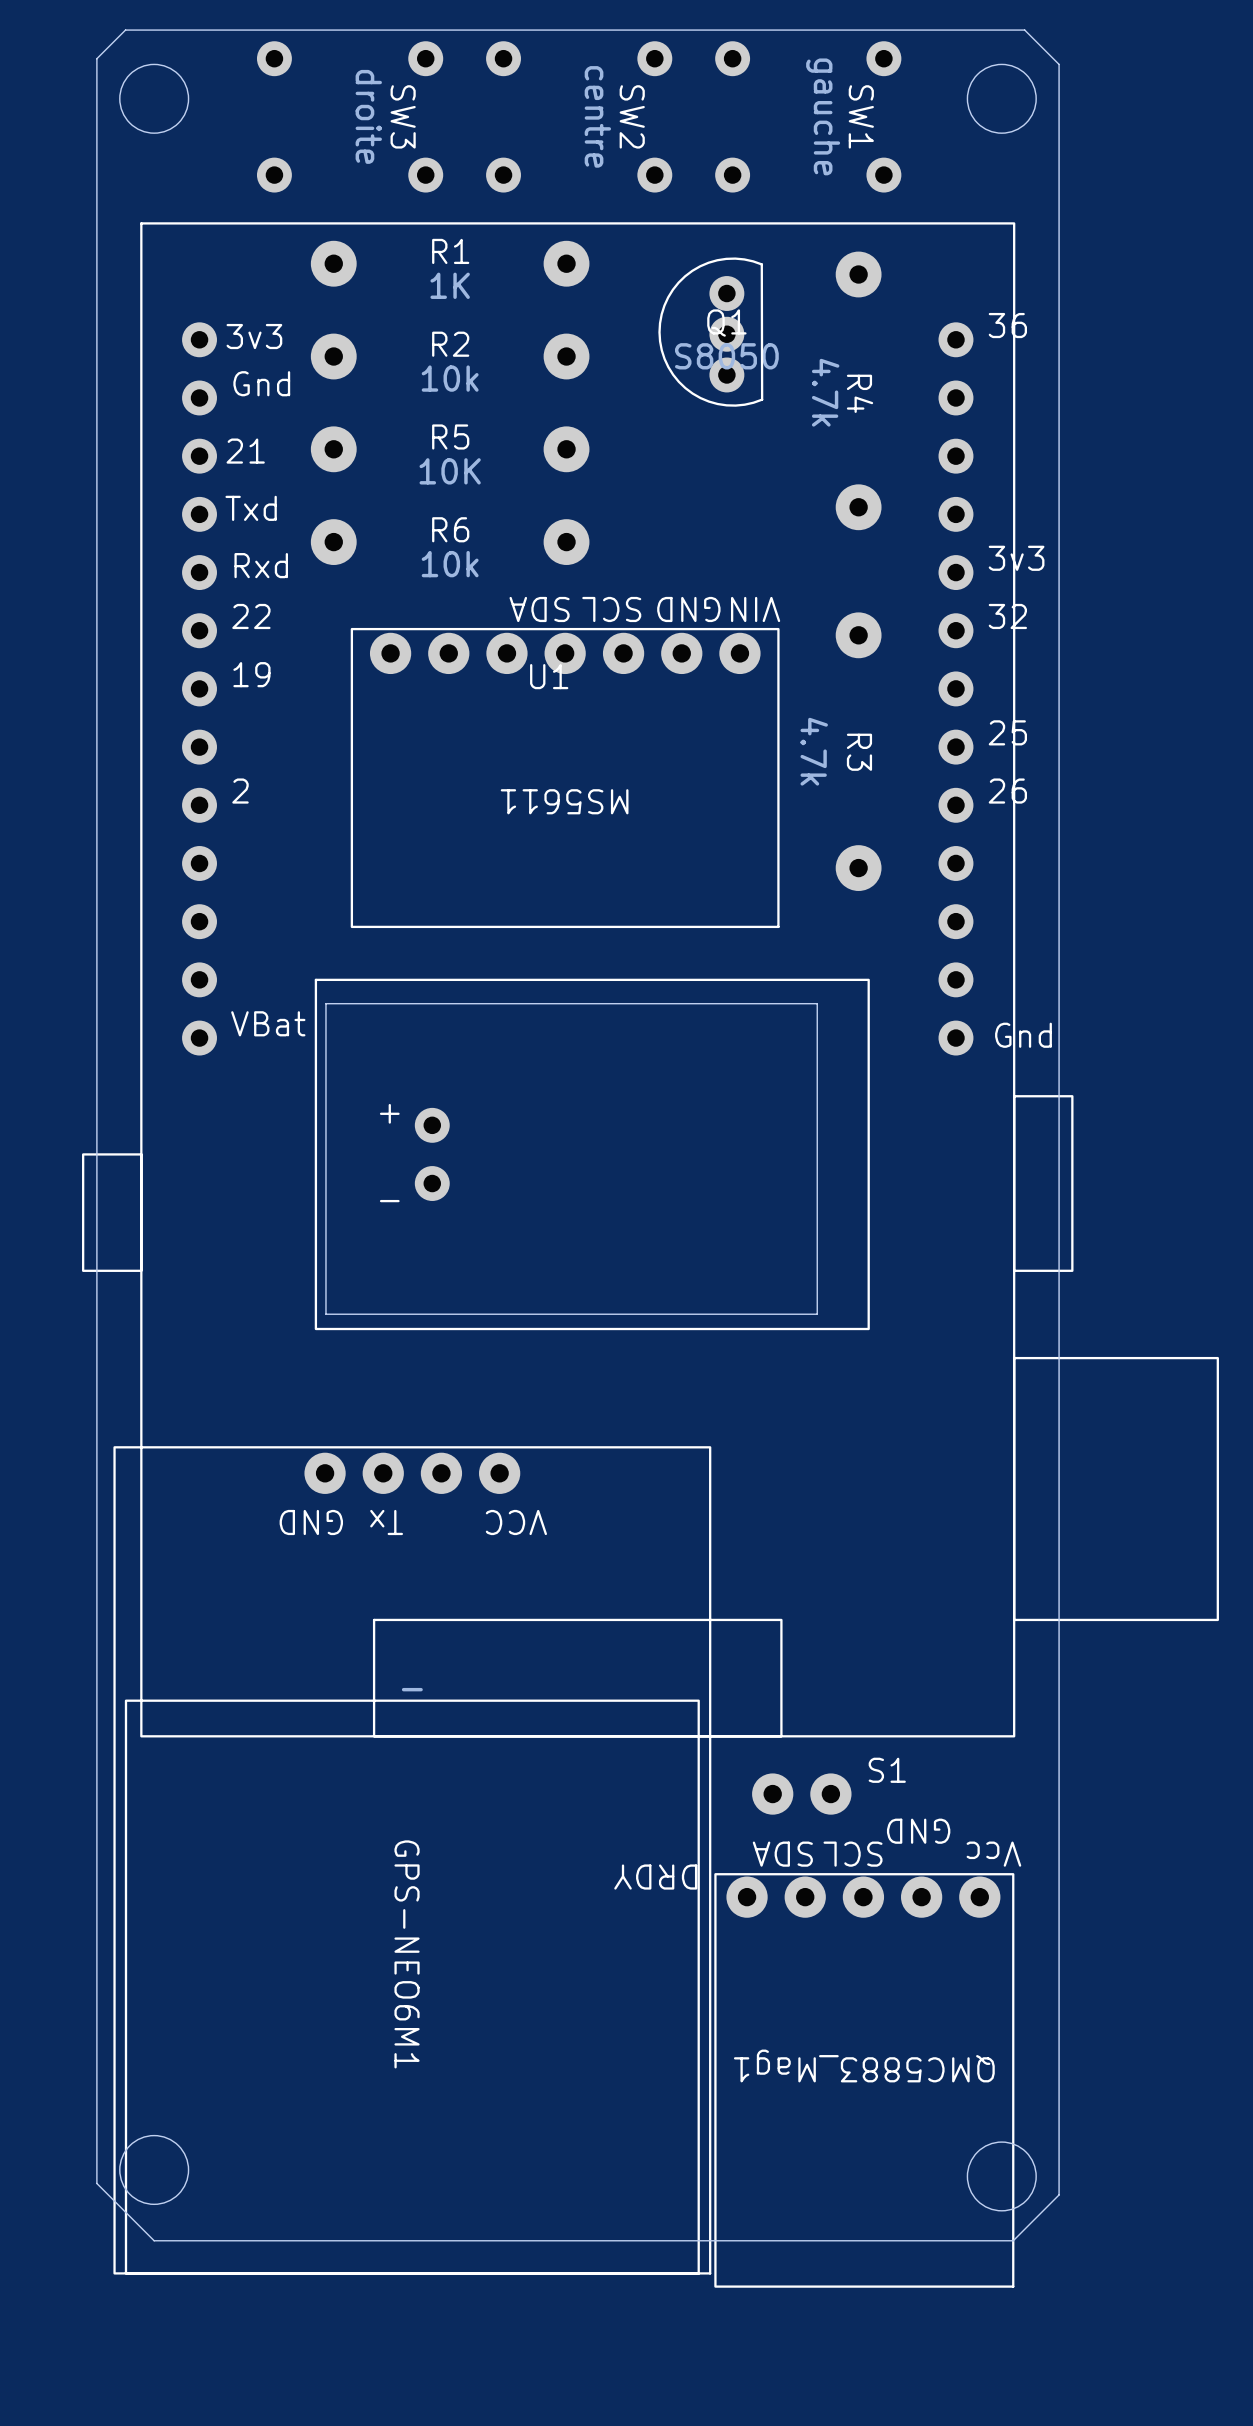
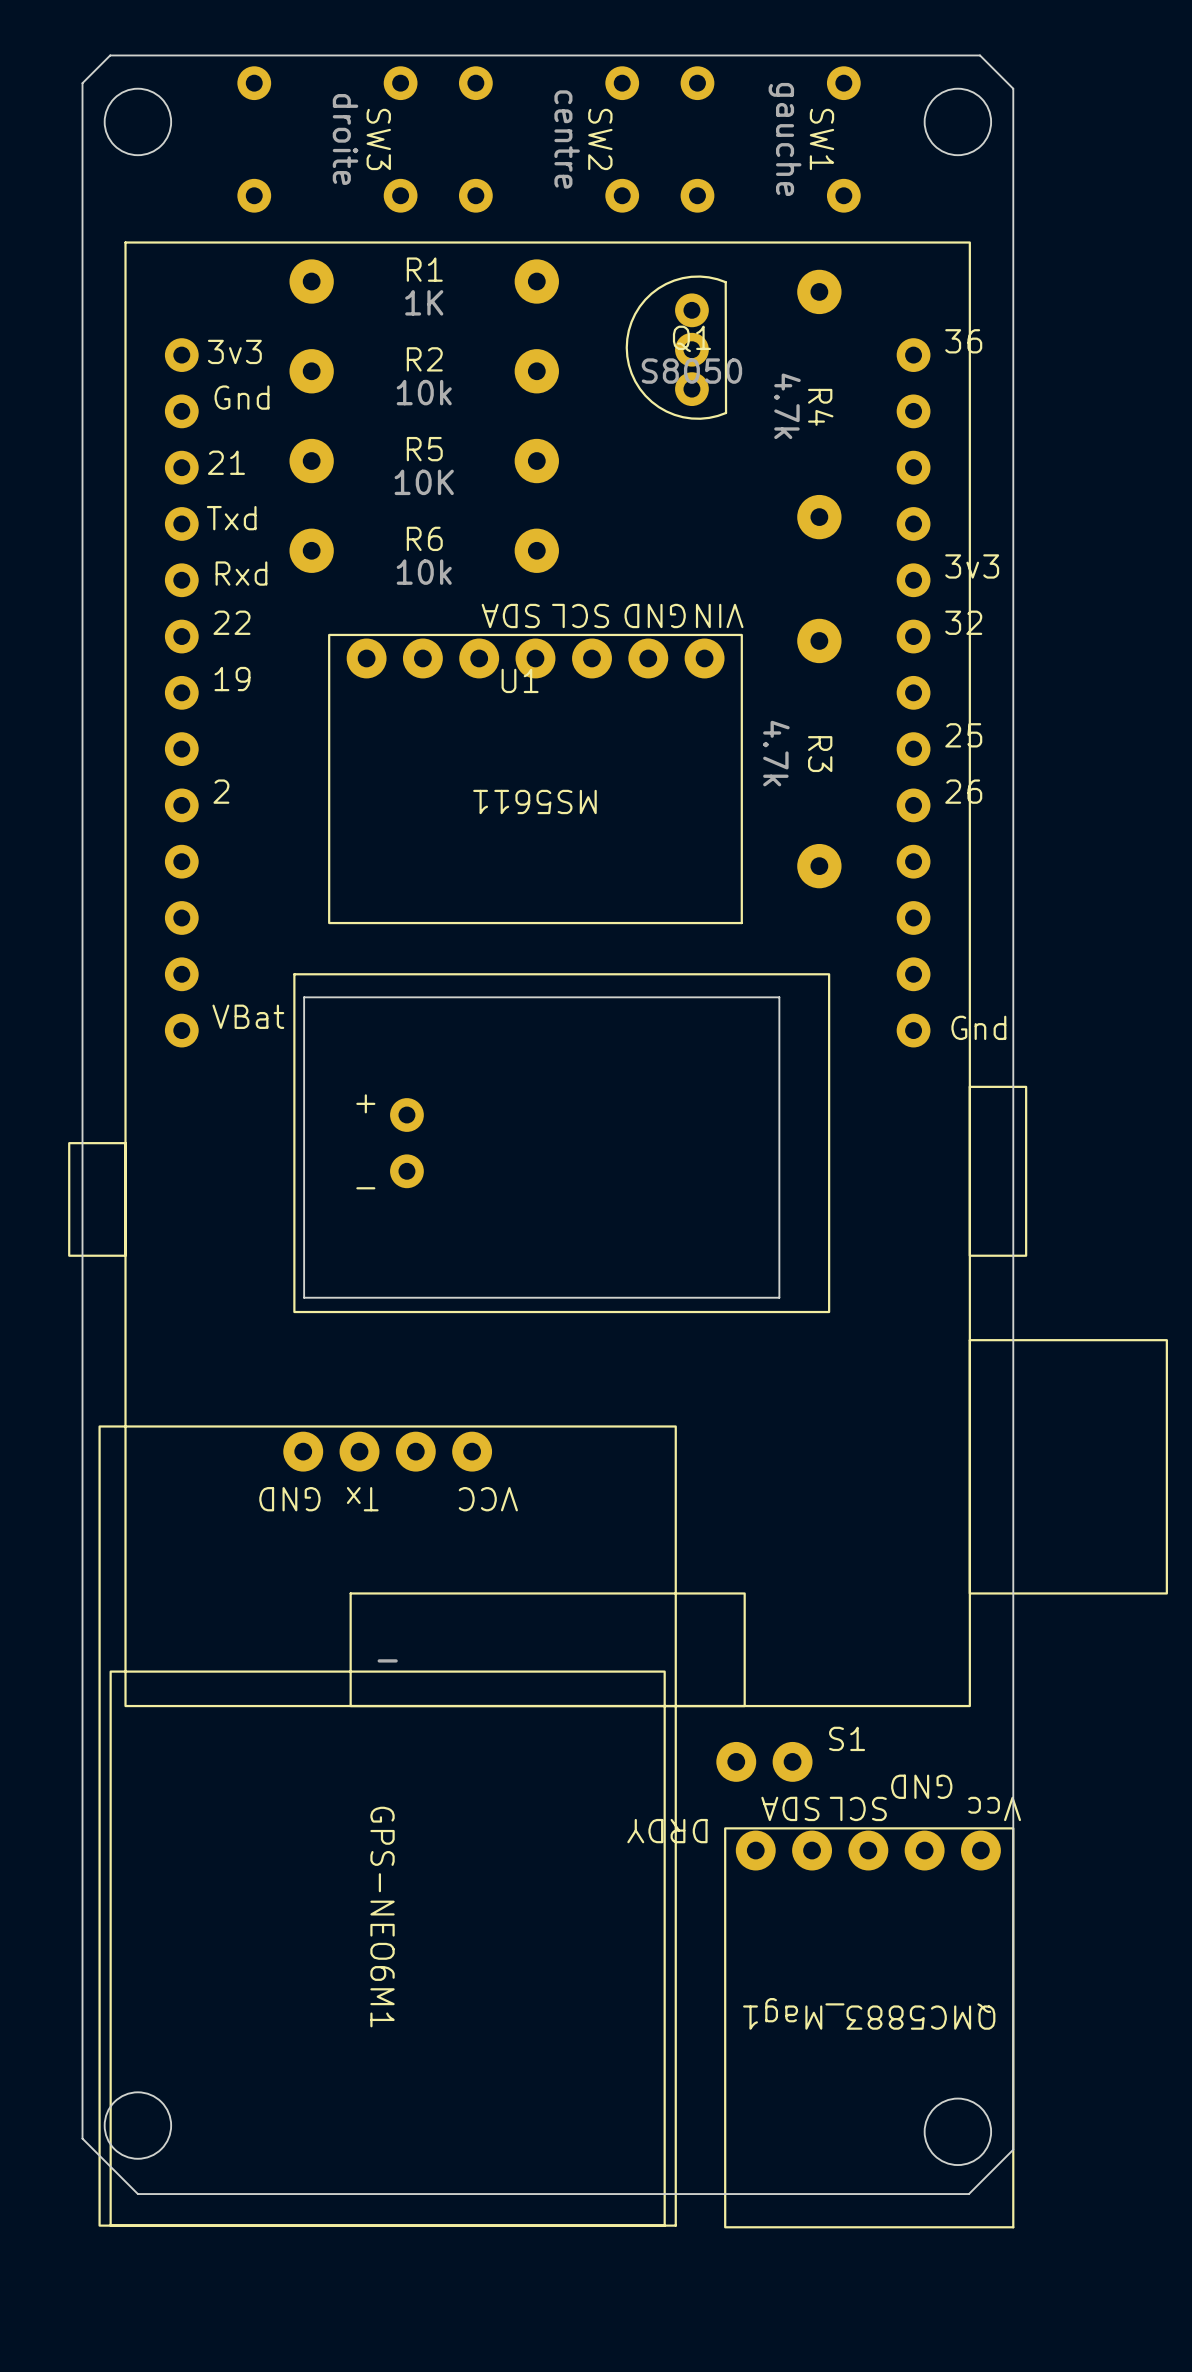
QMC5883_Mag1 position: (864, 2080) -> (869, 2027)

